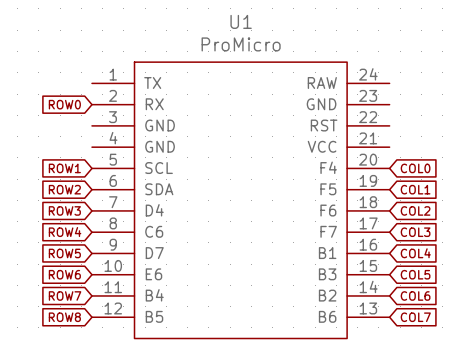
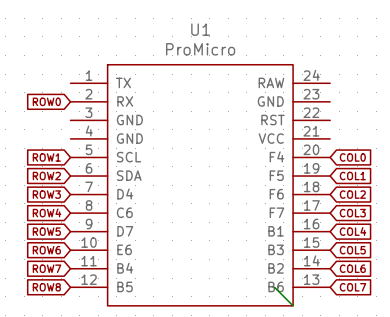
wire: none -> (274, 287) (293, 305)

